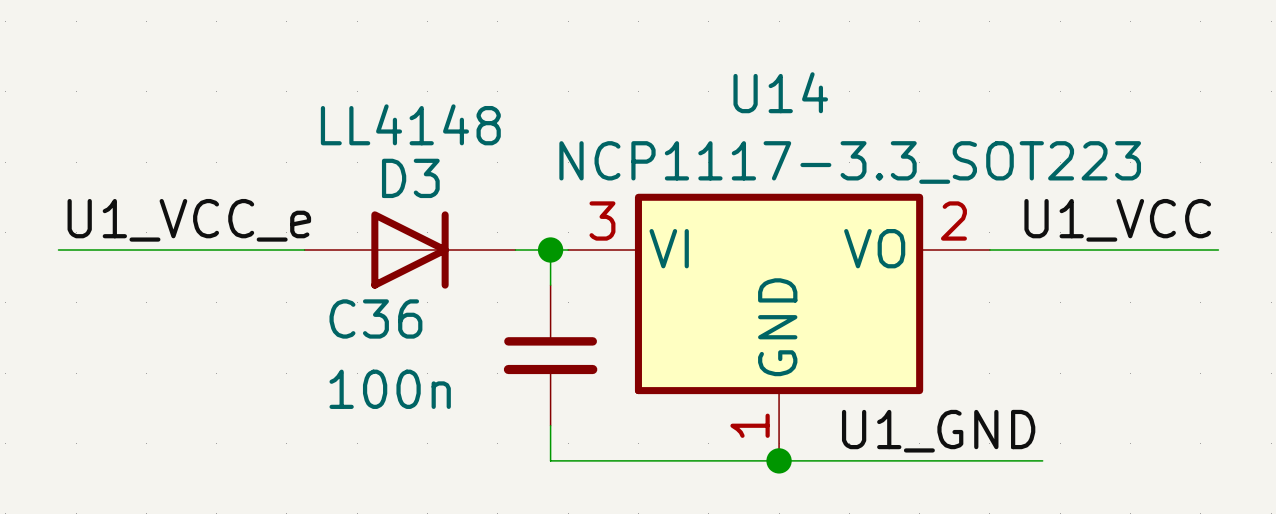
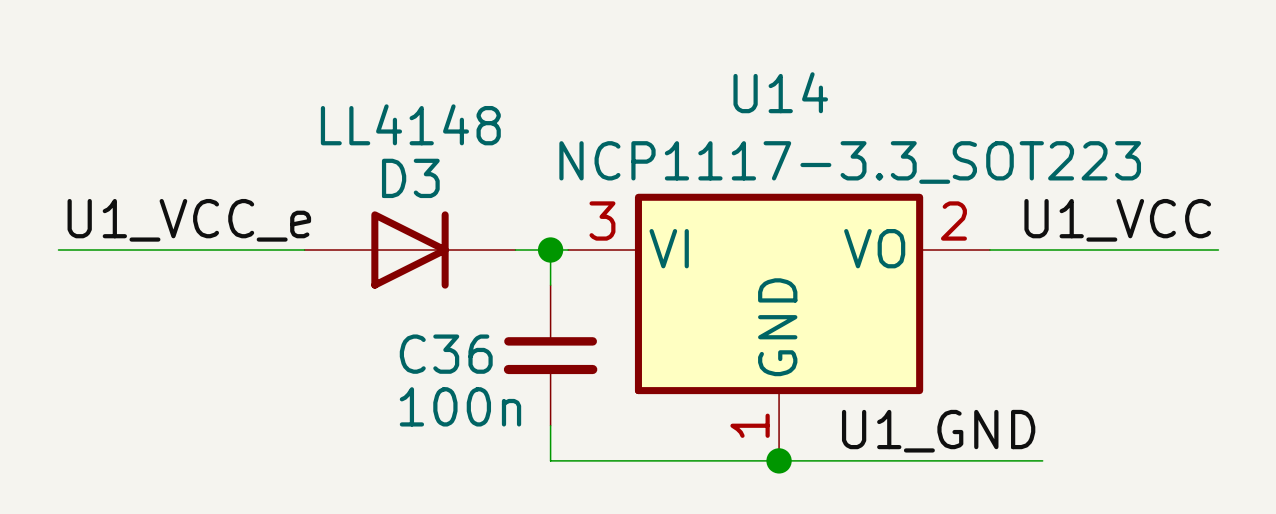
C36 name position: C36 (375, 318) -> C36 (446, 354)
C36 value position: 100n (390, 389) -> 100n (460, 406)

